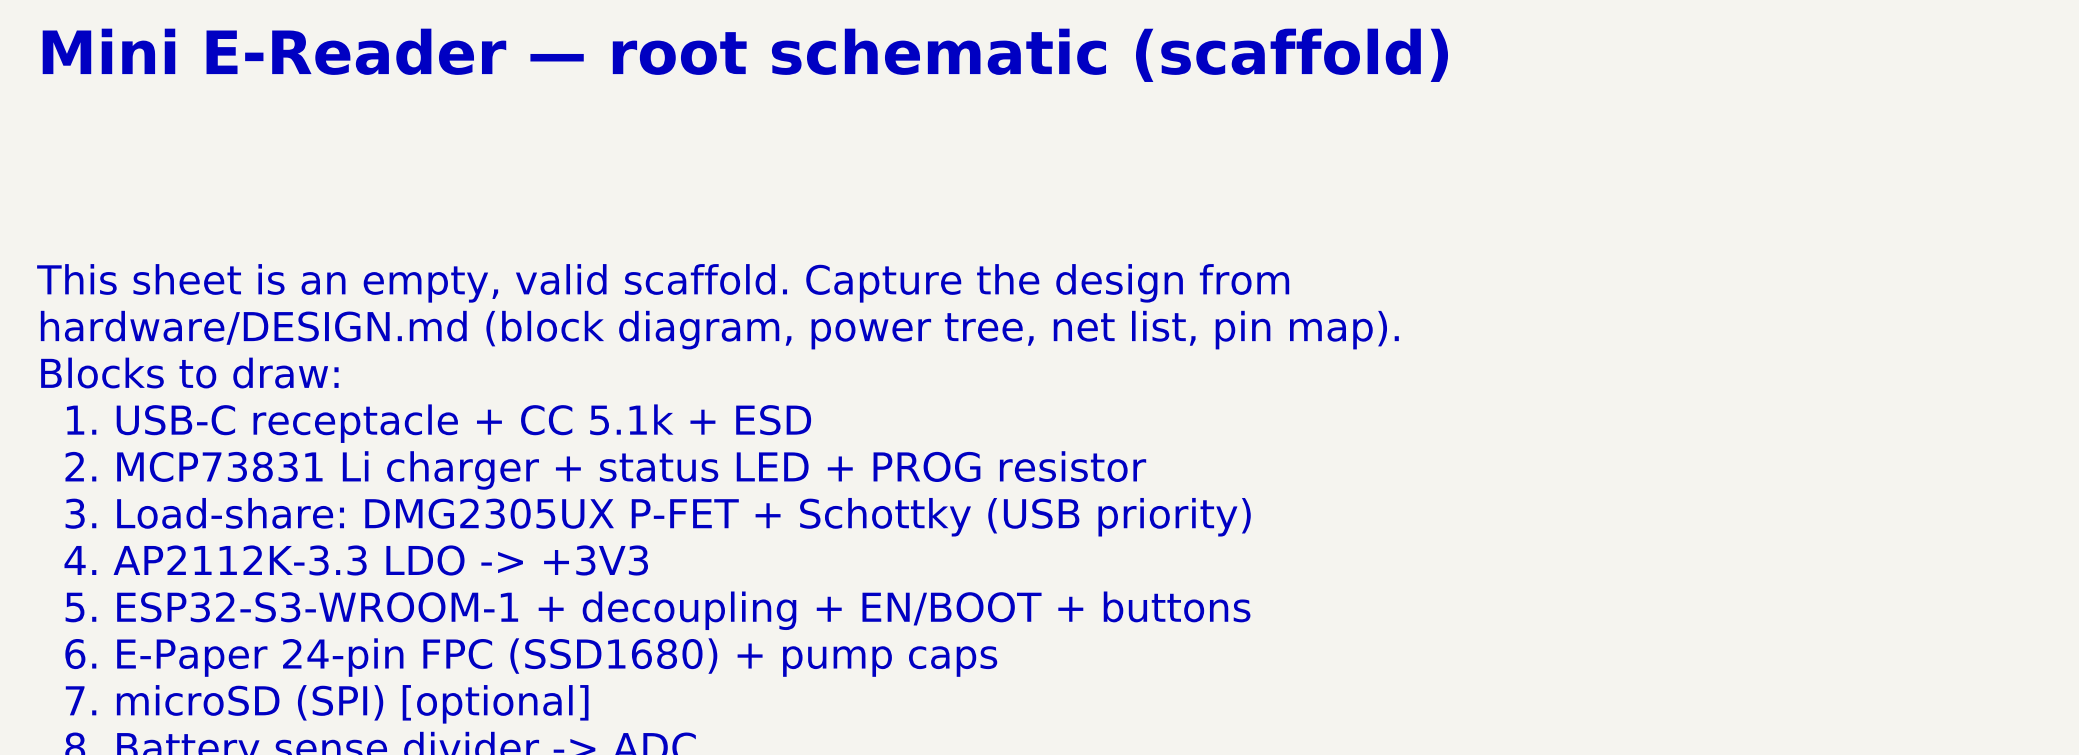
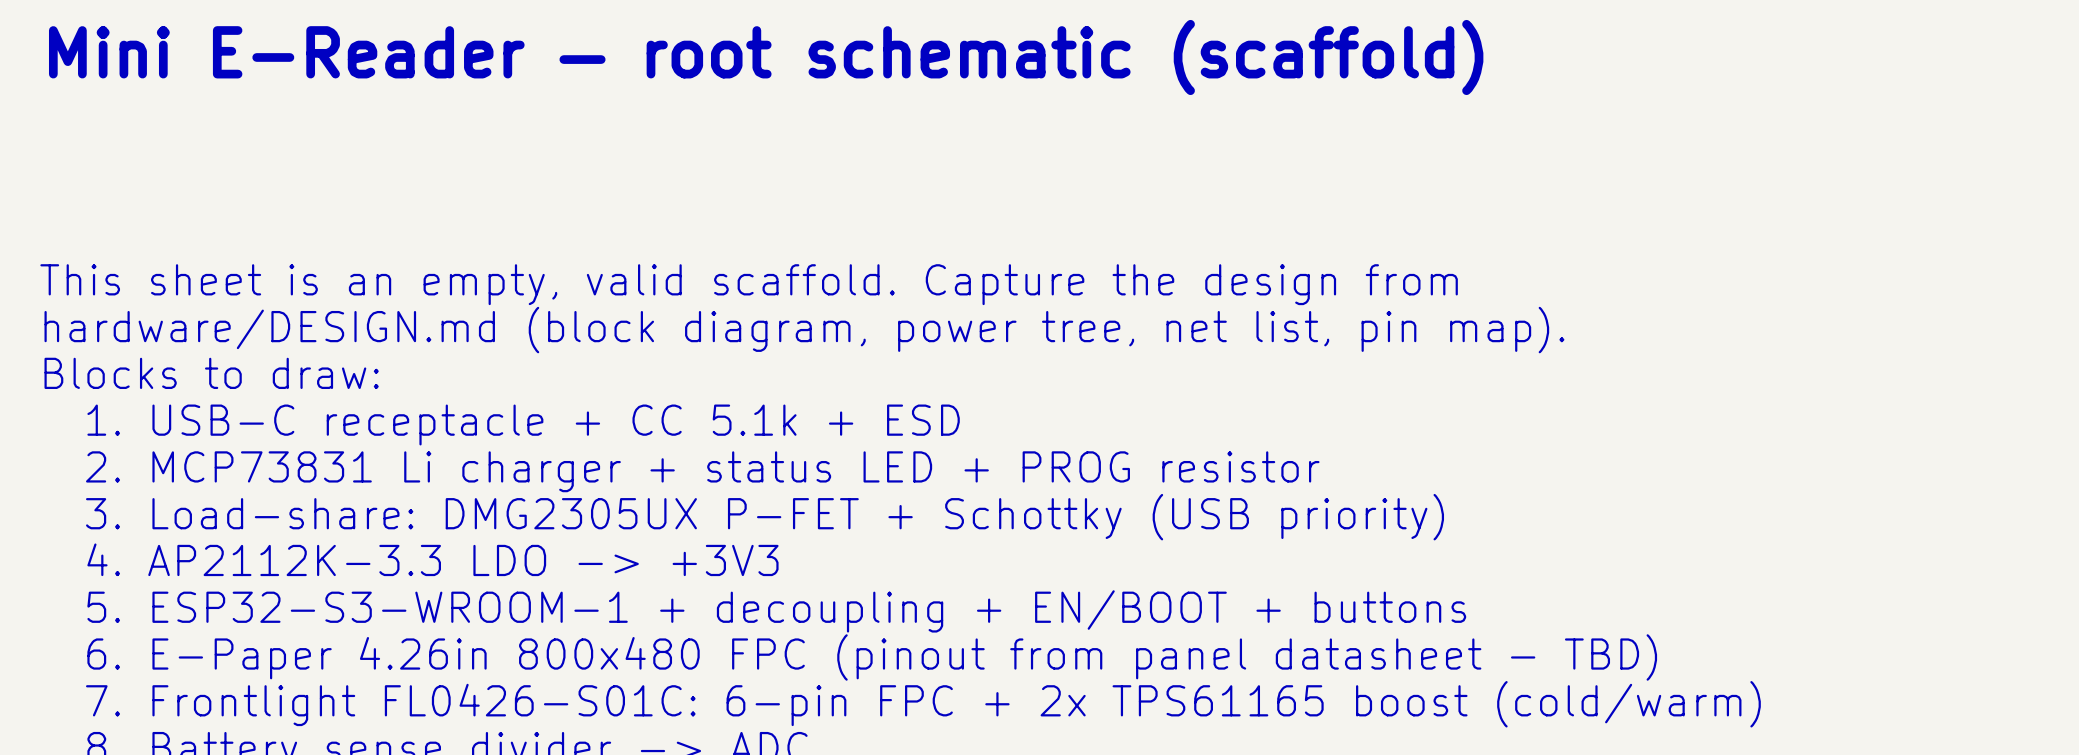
text: 6. E-Paper 24-pin FPC (SSD1680) + pump caps (531, 657) -> 6. E-Paper 4.26in 800x480 FPC (pinout from panel datasheet - TBD) (872, 657)
text: 7. microSD (SPI) [optional] (327, 704) -> 7. Frontlight FL0426-S01C: 6-pin FPC + 2x TPS61165 boost (cold/warm) (923, 704)

